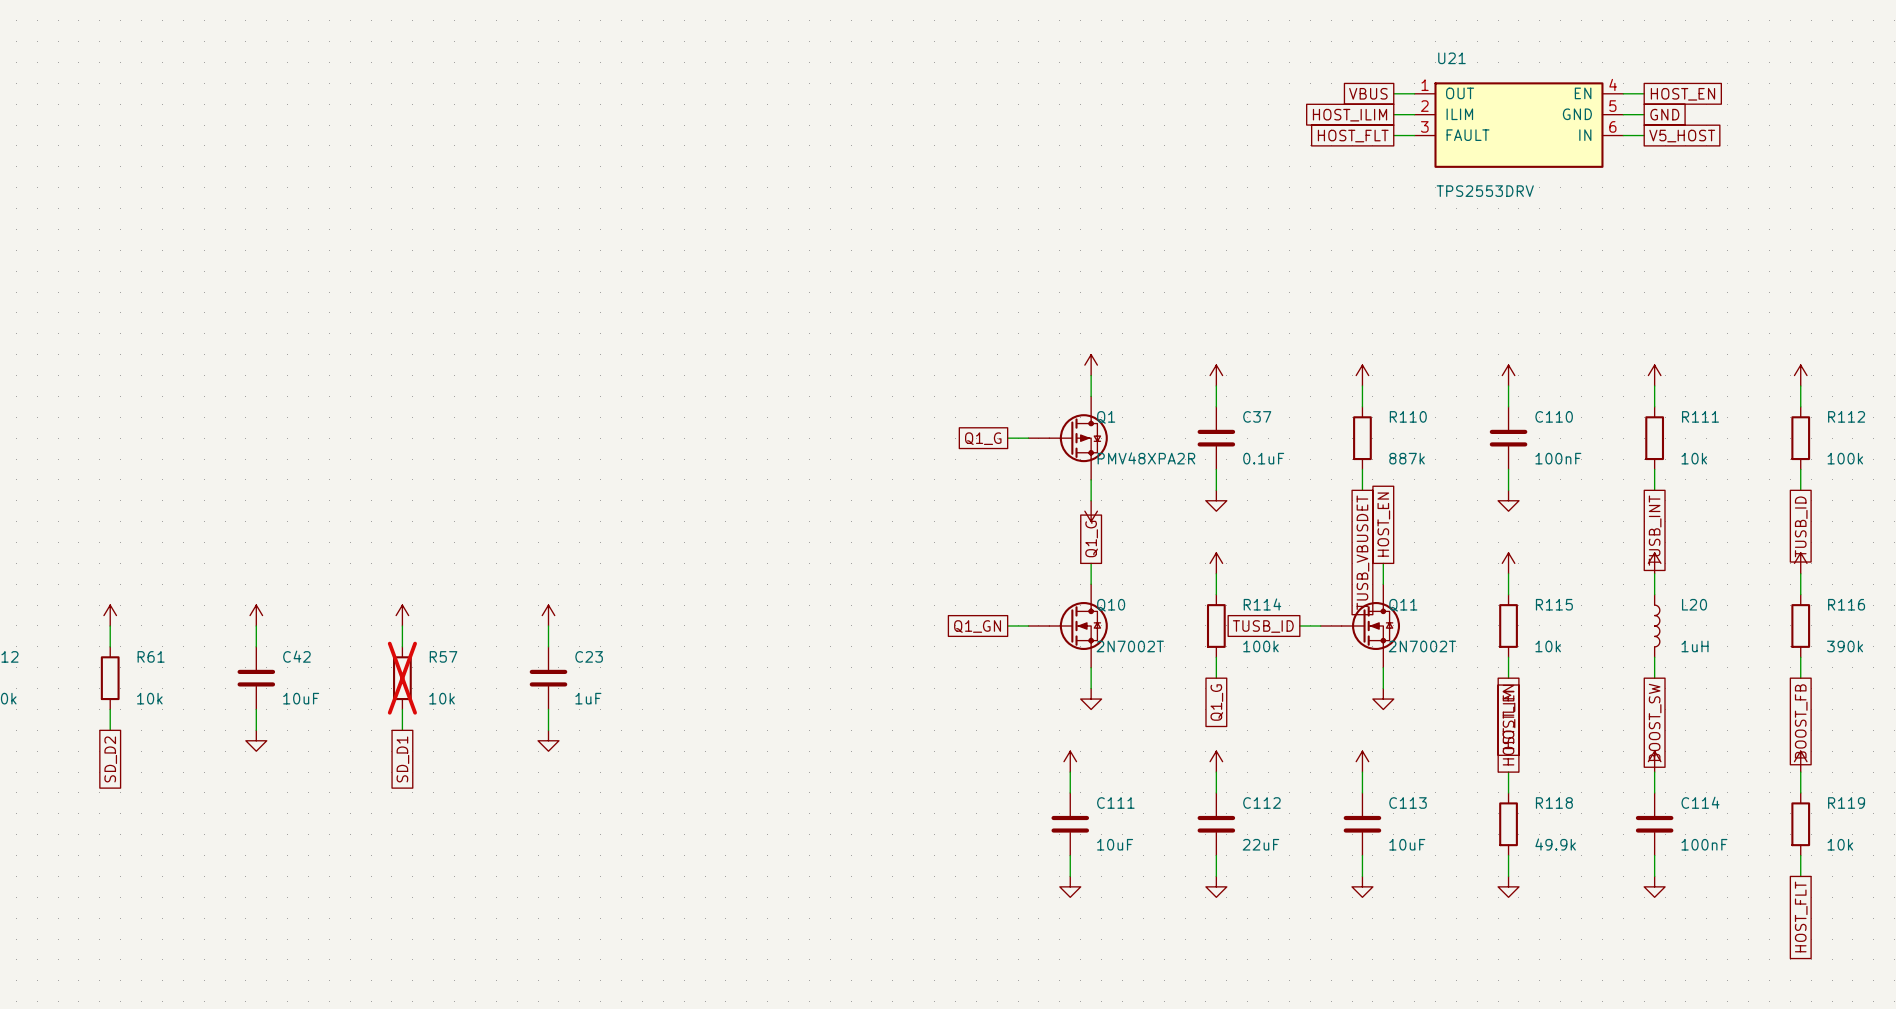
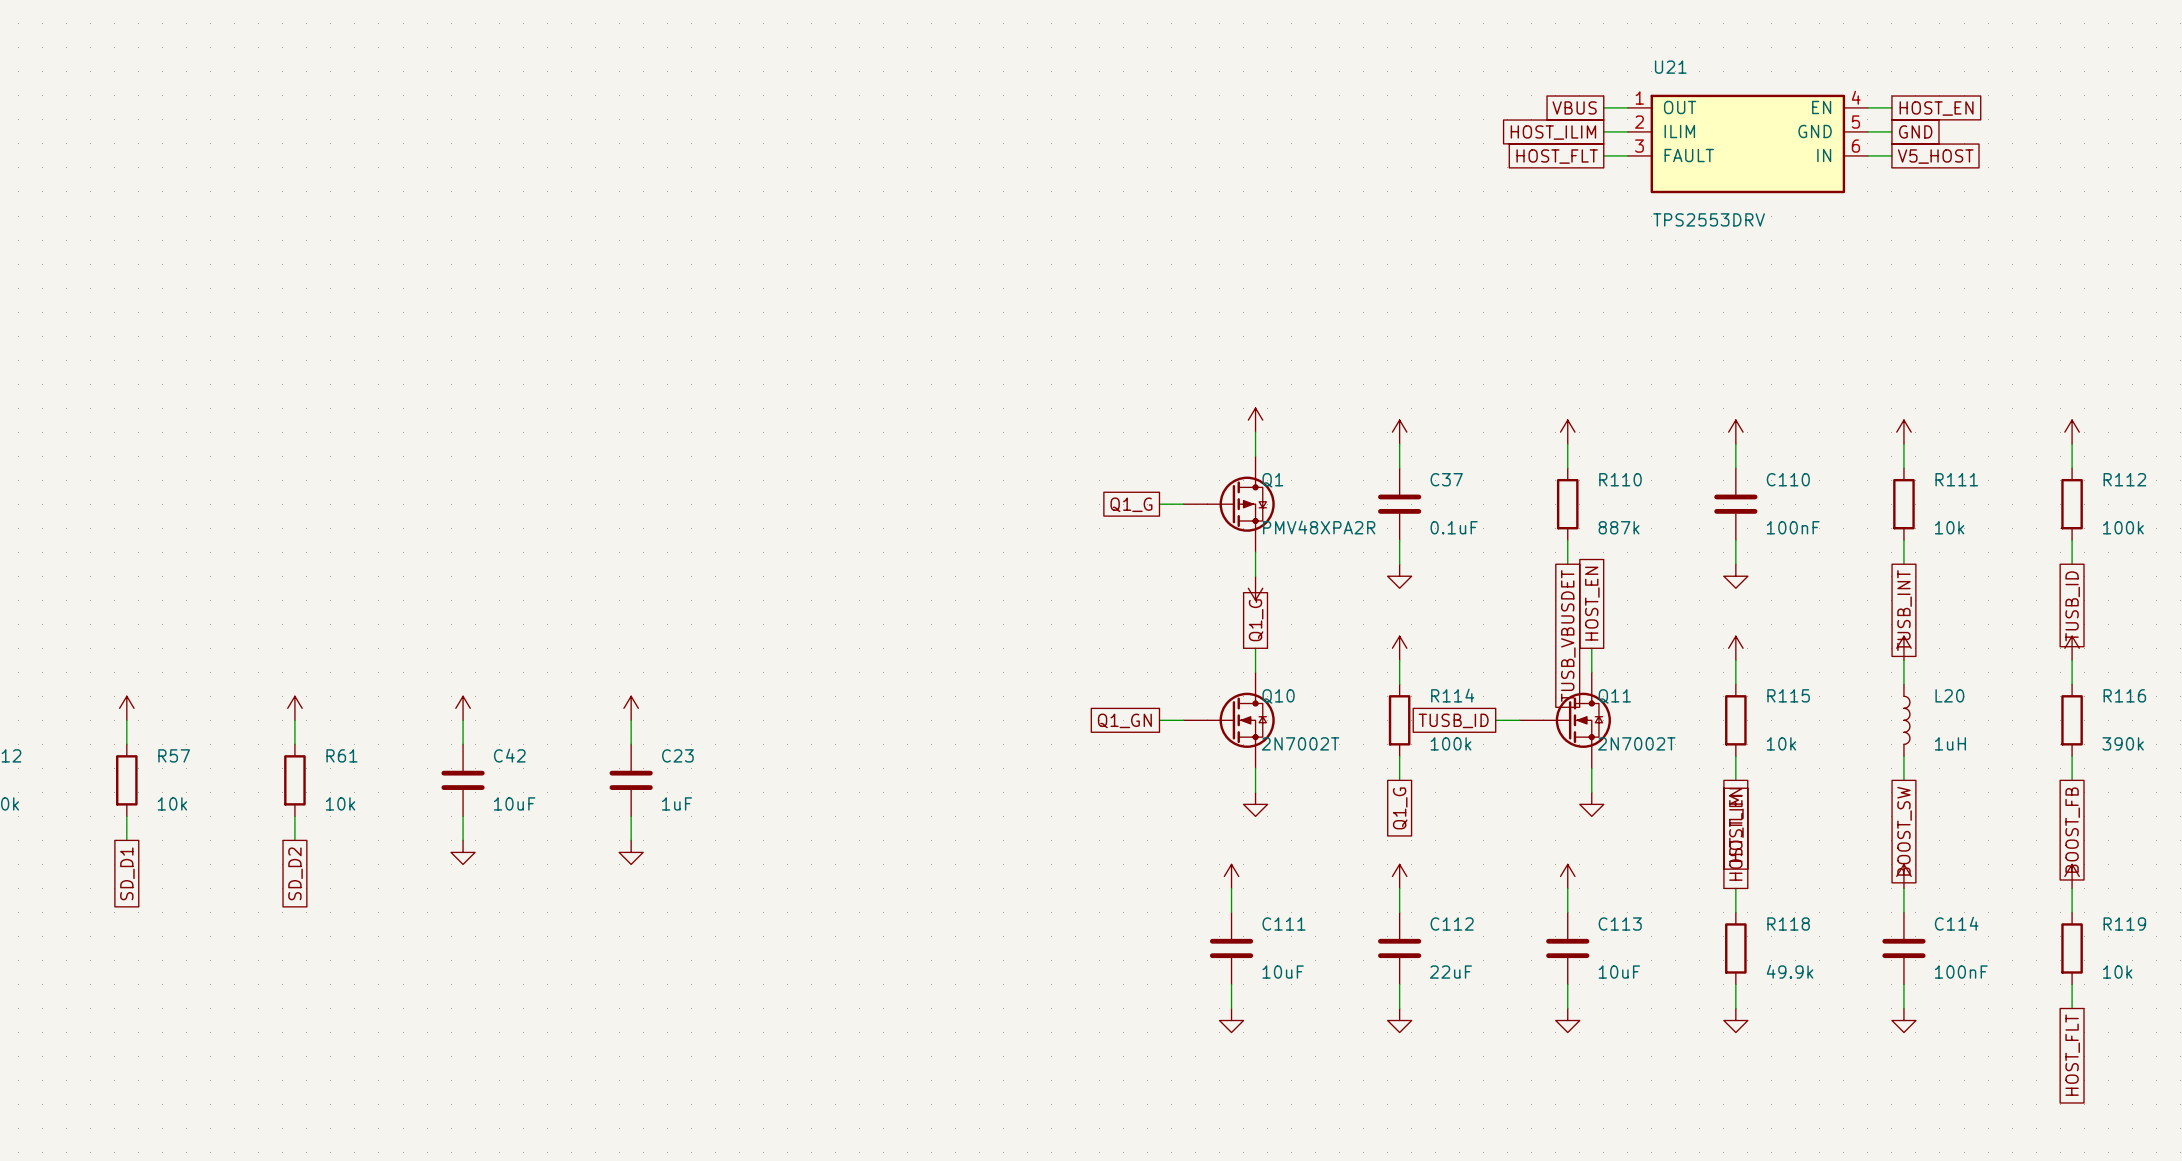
R61 name: R61 (151, 656) -> R57 (174, 755)
C42 position: (256, 678) -> (463, 780)
R61: none -> 10k (294, 780)
R57: 10k (402, 678) -> none
power symbol position: (256, 740) -> (463, 852)
global label: SD_D2 (110, 759) -> SD_D1 (127, 873)
global label: none -> SD_D2 (295, 873)
global label: SD_D1 (402, 759) -> none

